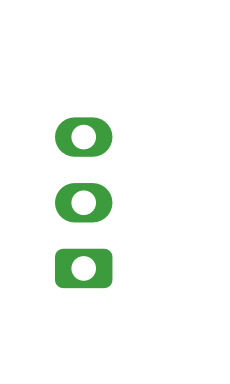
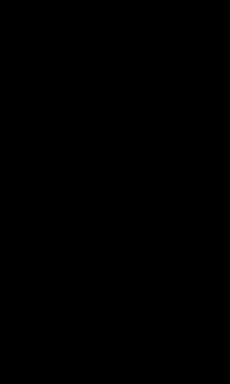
part: (83, 202) -> none

